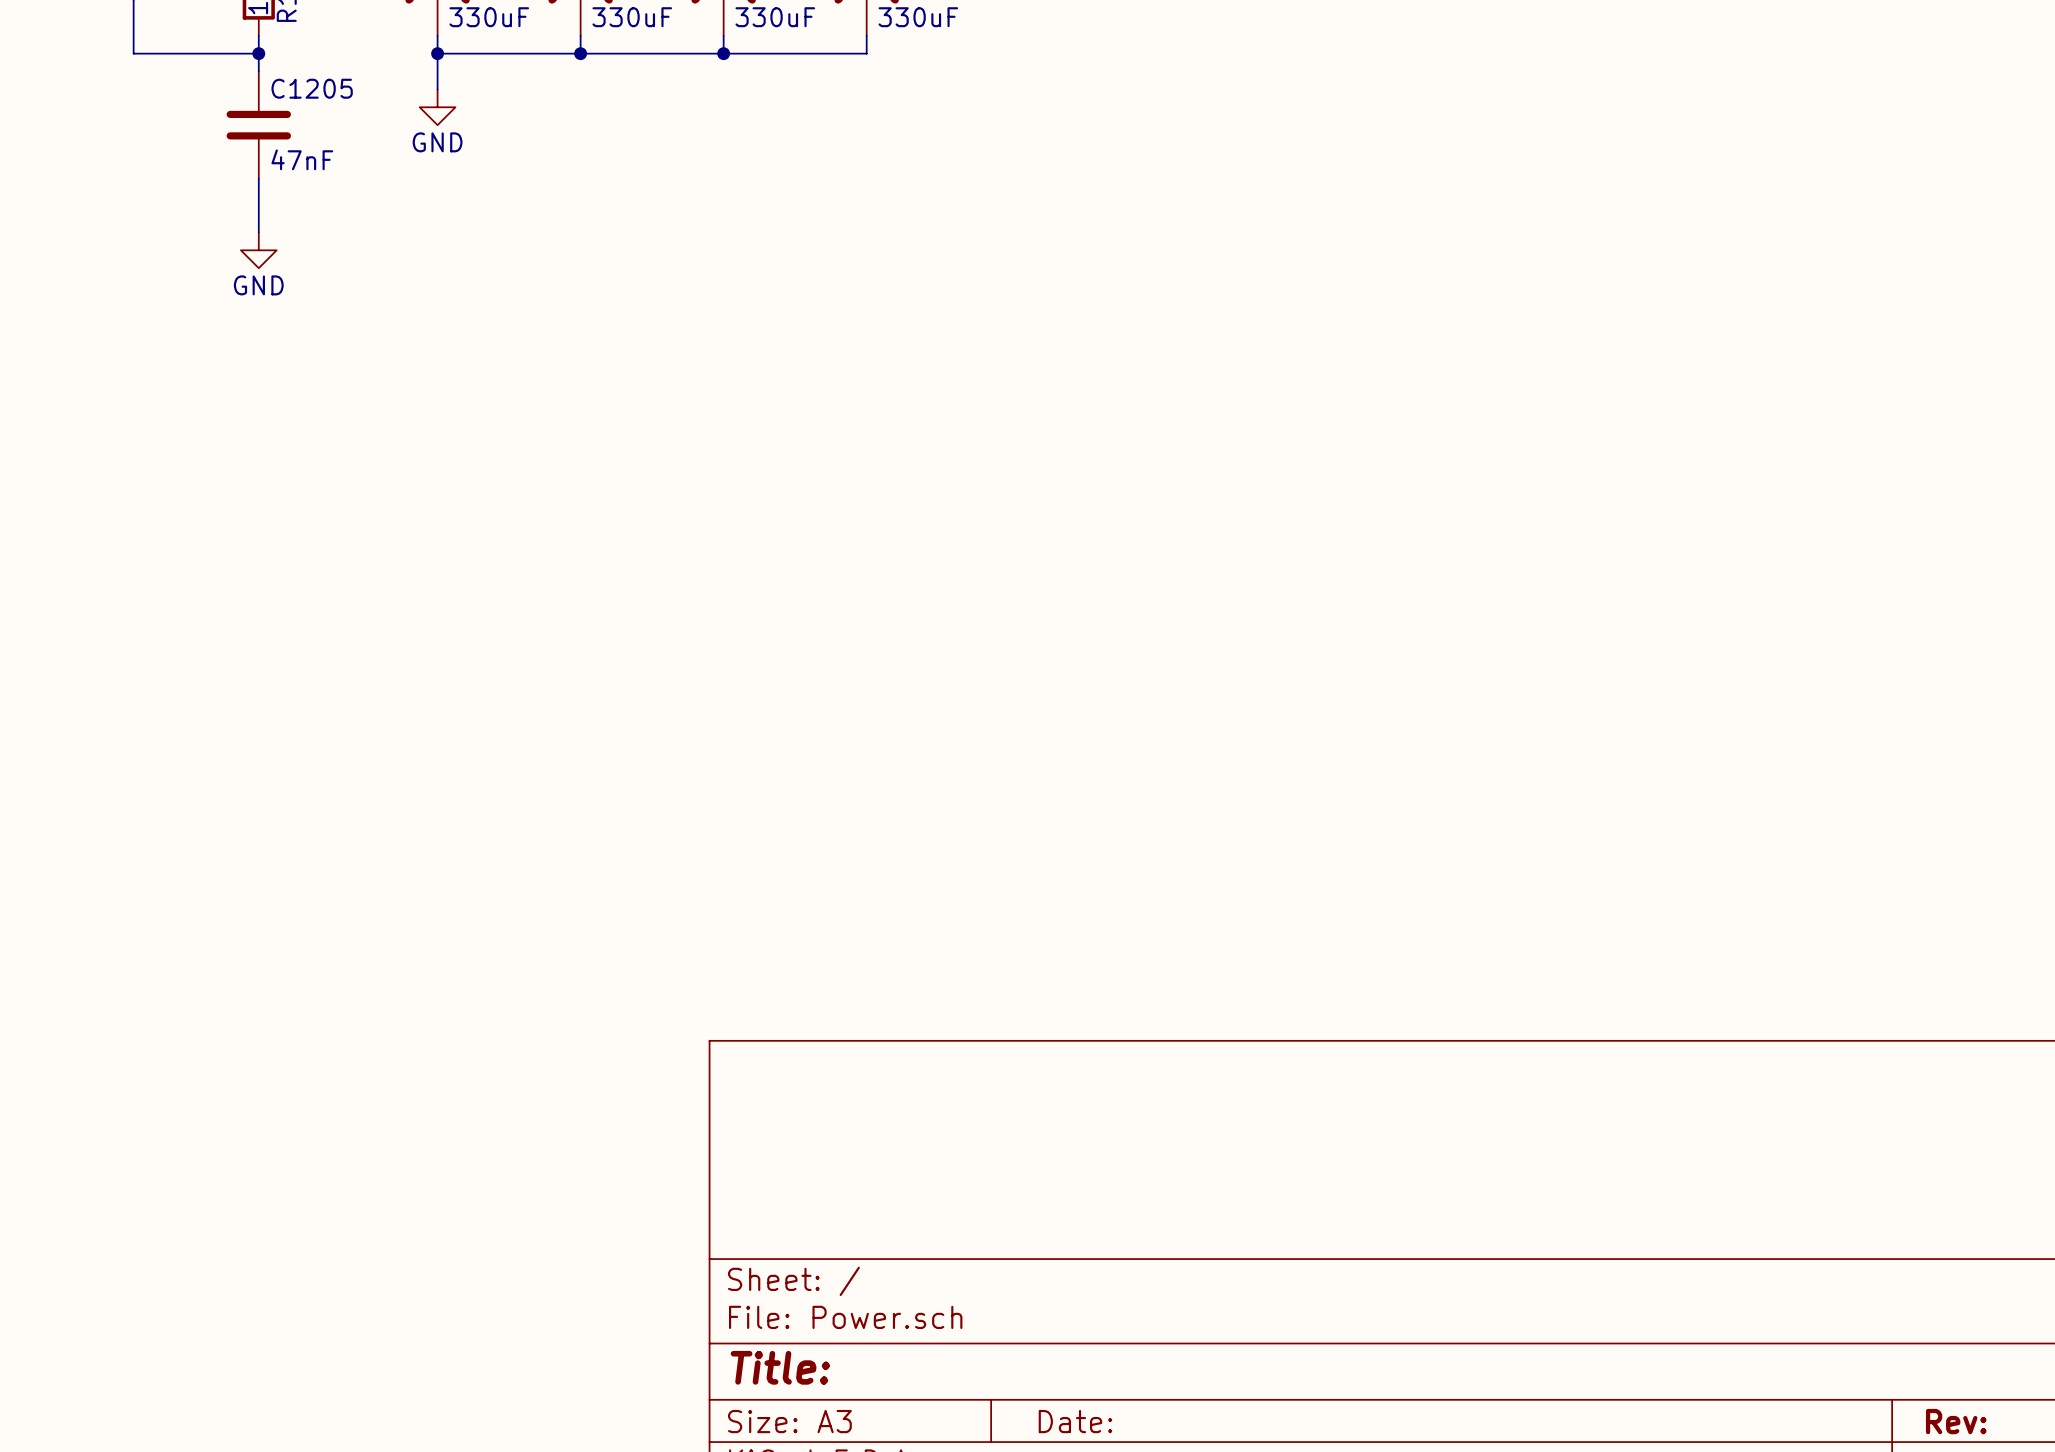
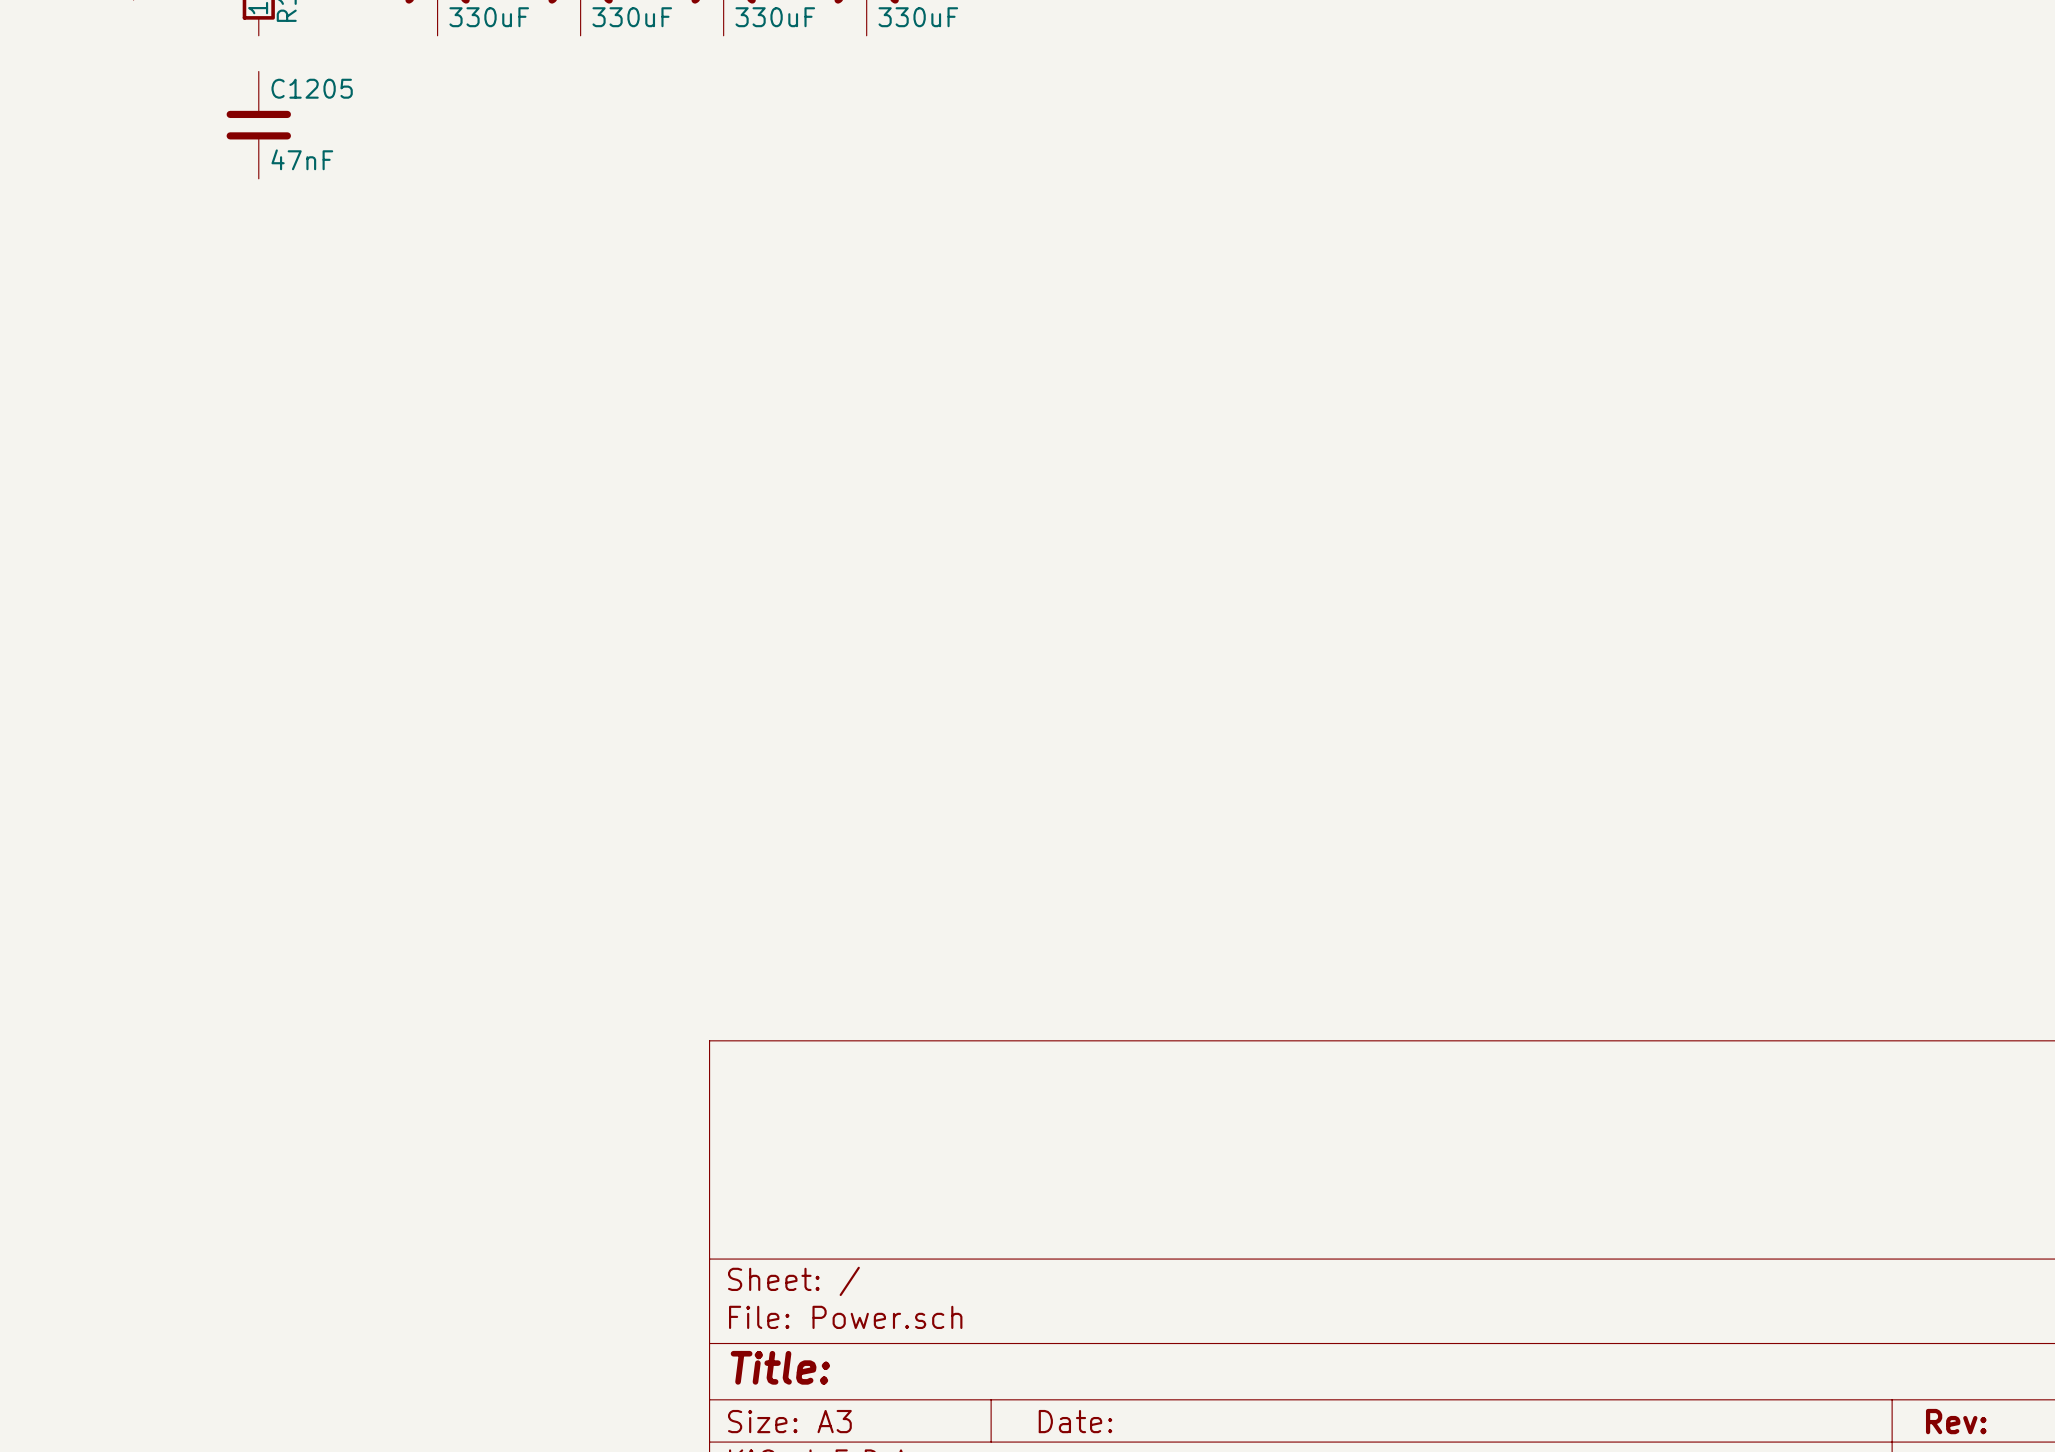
wire: (133, 0) (133, 53) (258, 53) -> none
wire: (258, 35) (258, 71) -> none
wire: (437, 35) (437, 89) -> none
wire: (580, 35) (580, 53) -> none
wire: (723, 35) (723, 53) -> none
wire: (866, 35) (866, 53) (437, 53) -> none
junction: (258, 53) -> none
junction: (437, 53) -> none
junction: (580, 53) -> none
junction: (723, 53) -> none
power symbol: GND (437, 107) -> none
wire: (258, 178) (258, 232) -> none
power symbol: GND (258, 250) -> none

